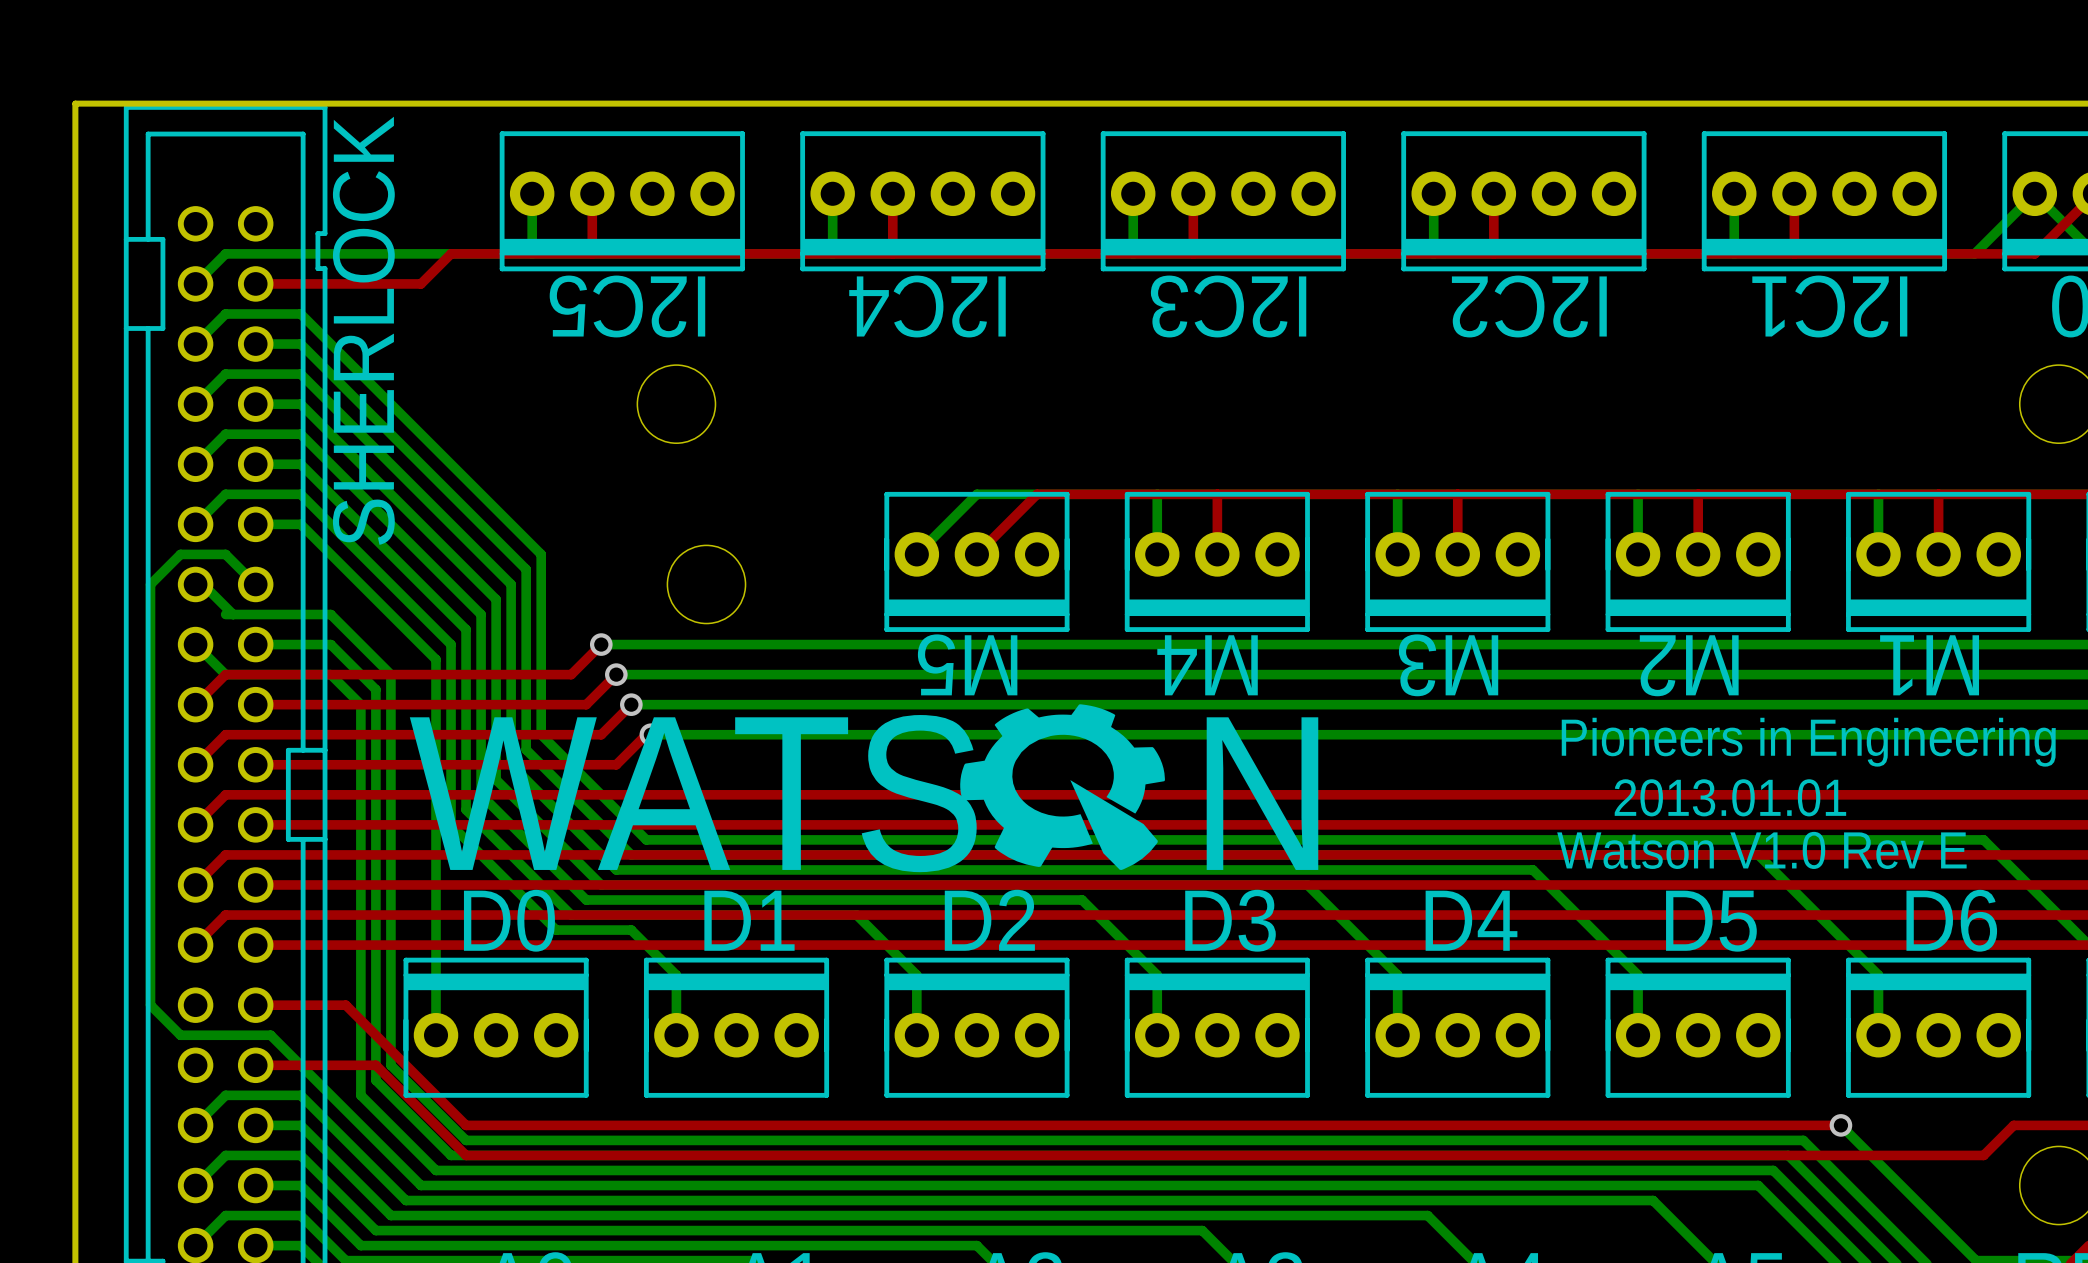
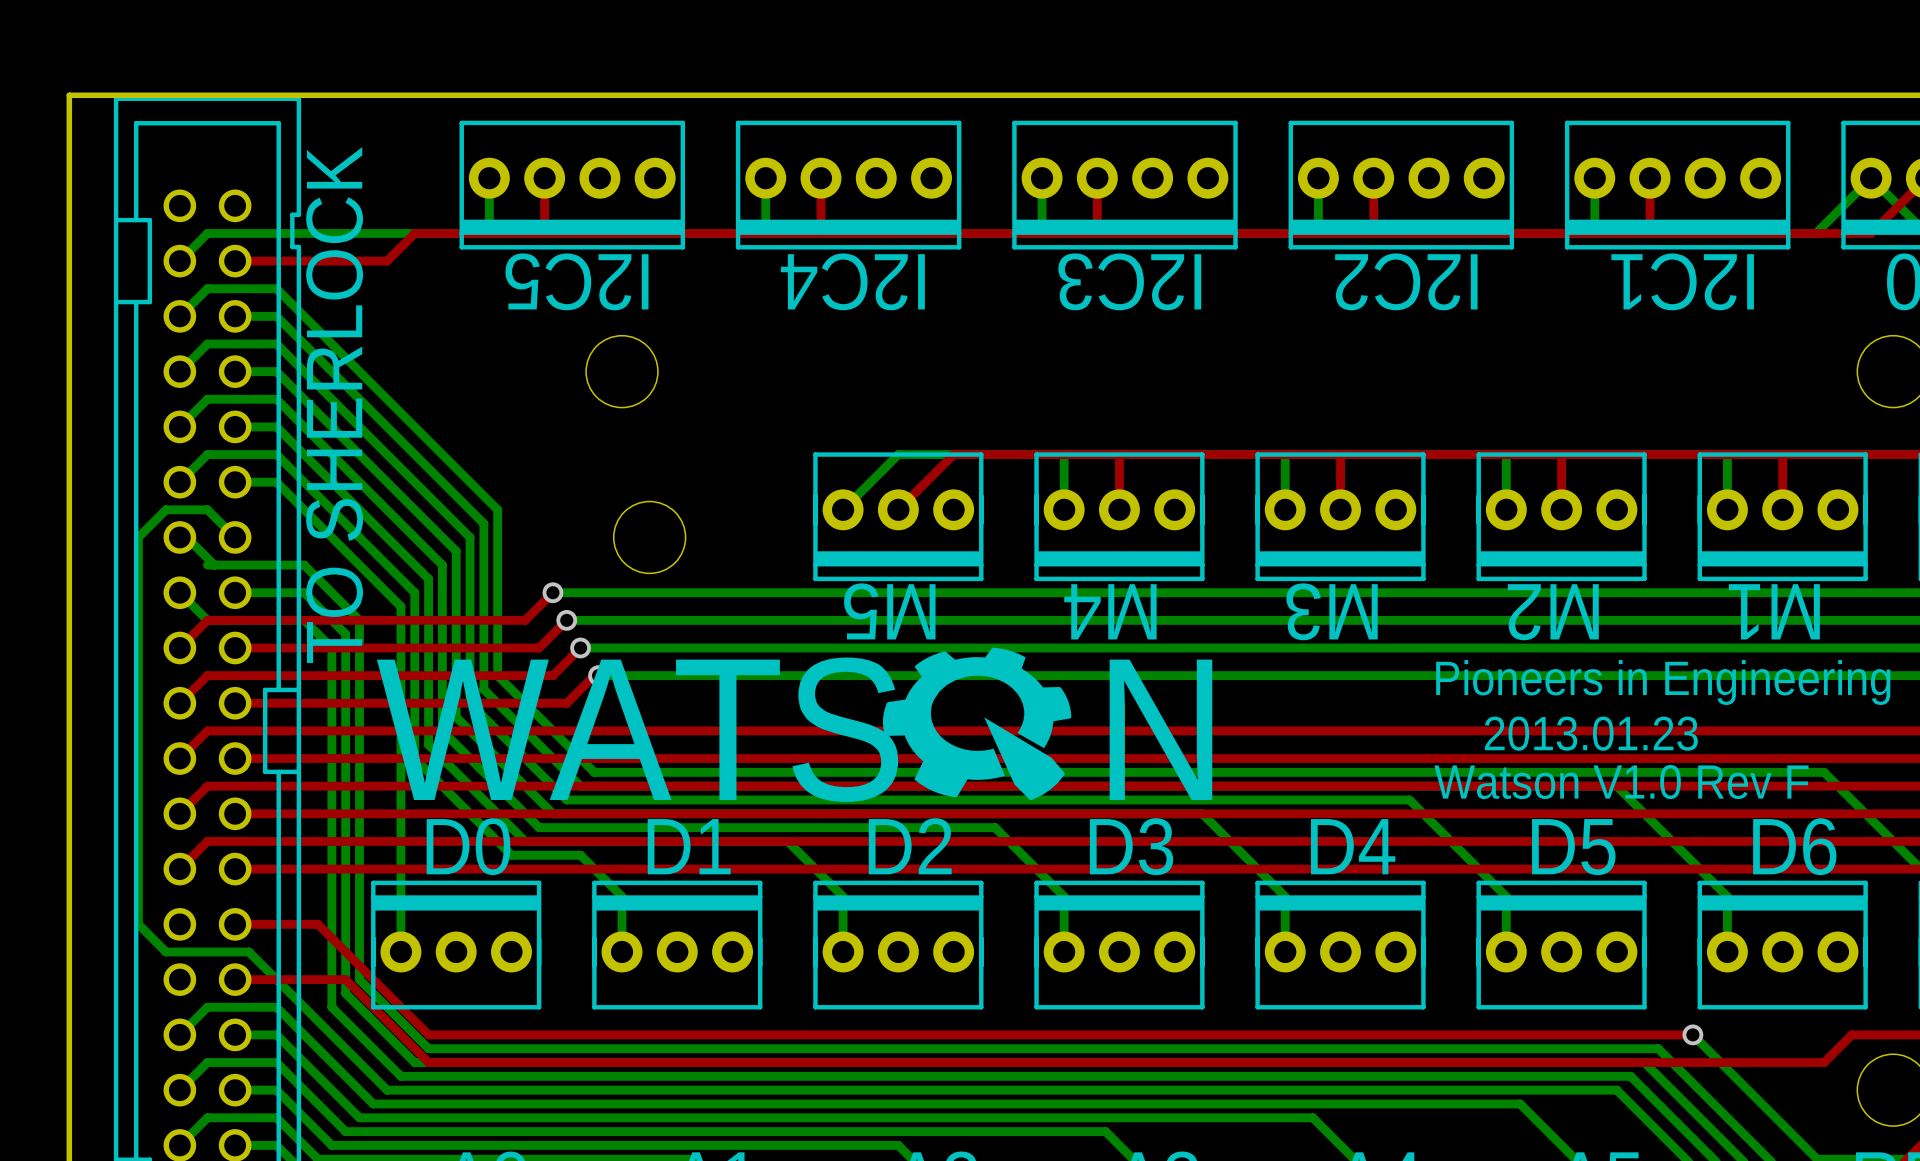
SHERLOCK name: SHERLOCK (363, 330) -> none
text: none -> TO SHERLOCK (334, 405)
text: 2013.01.01 (1730, 797) -> 2013.01.23 (1591, 733)
text: Watson V1.0 Rev E (1761, 850) -> Watson V1.0 Rev F (1621, 782)

